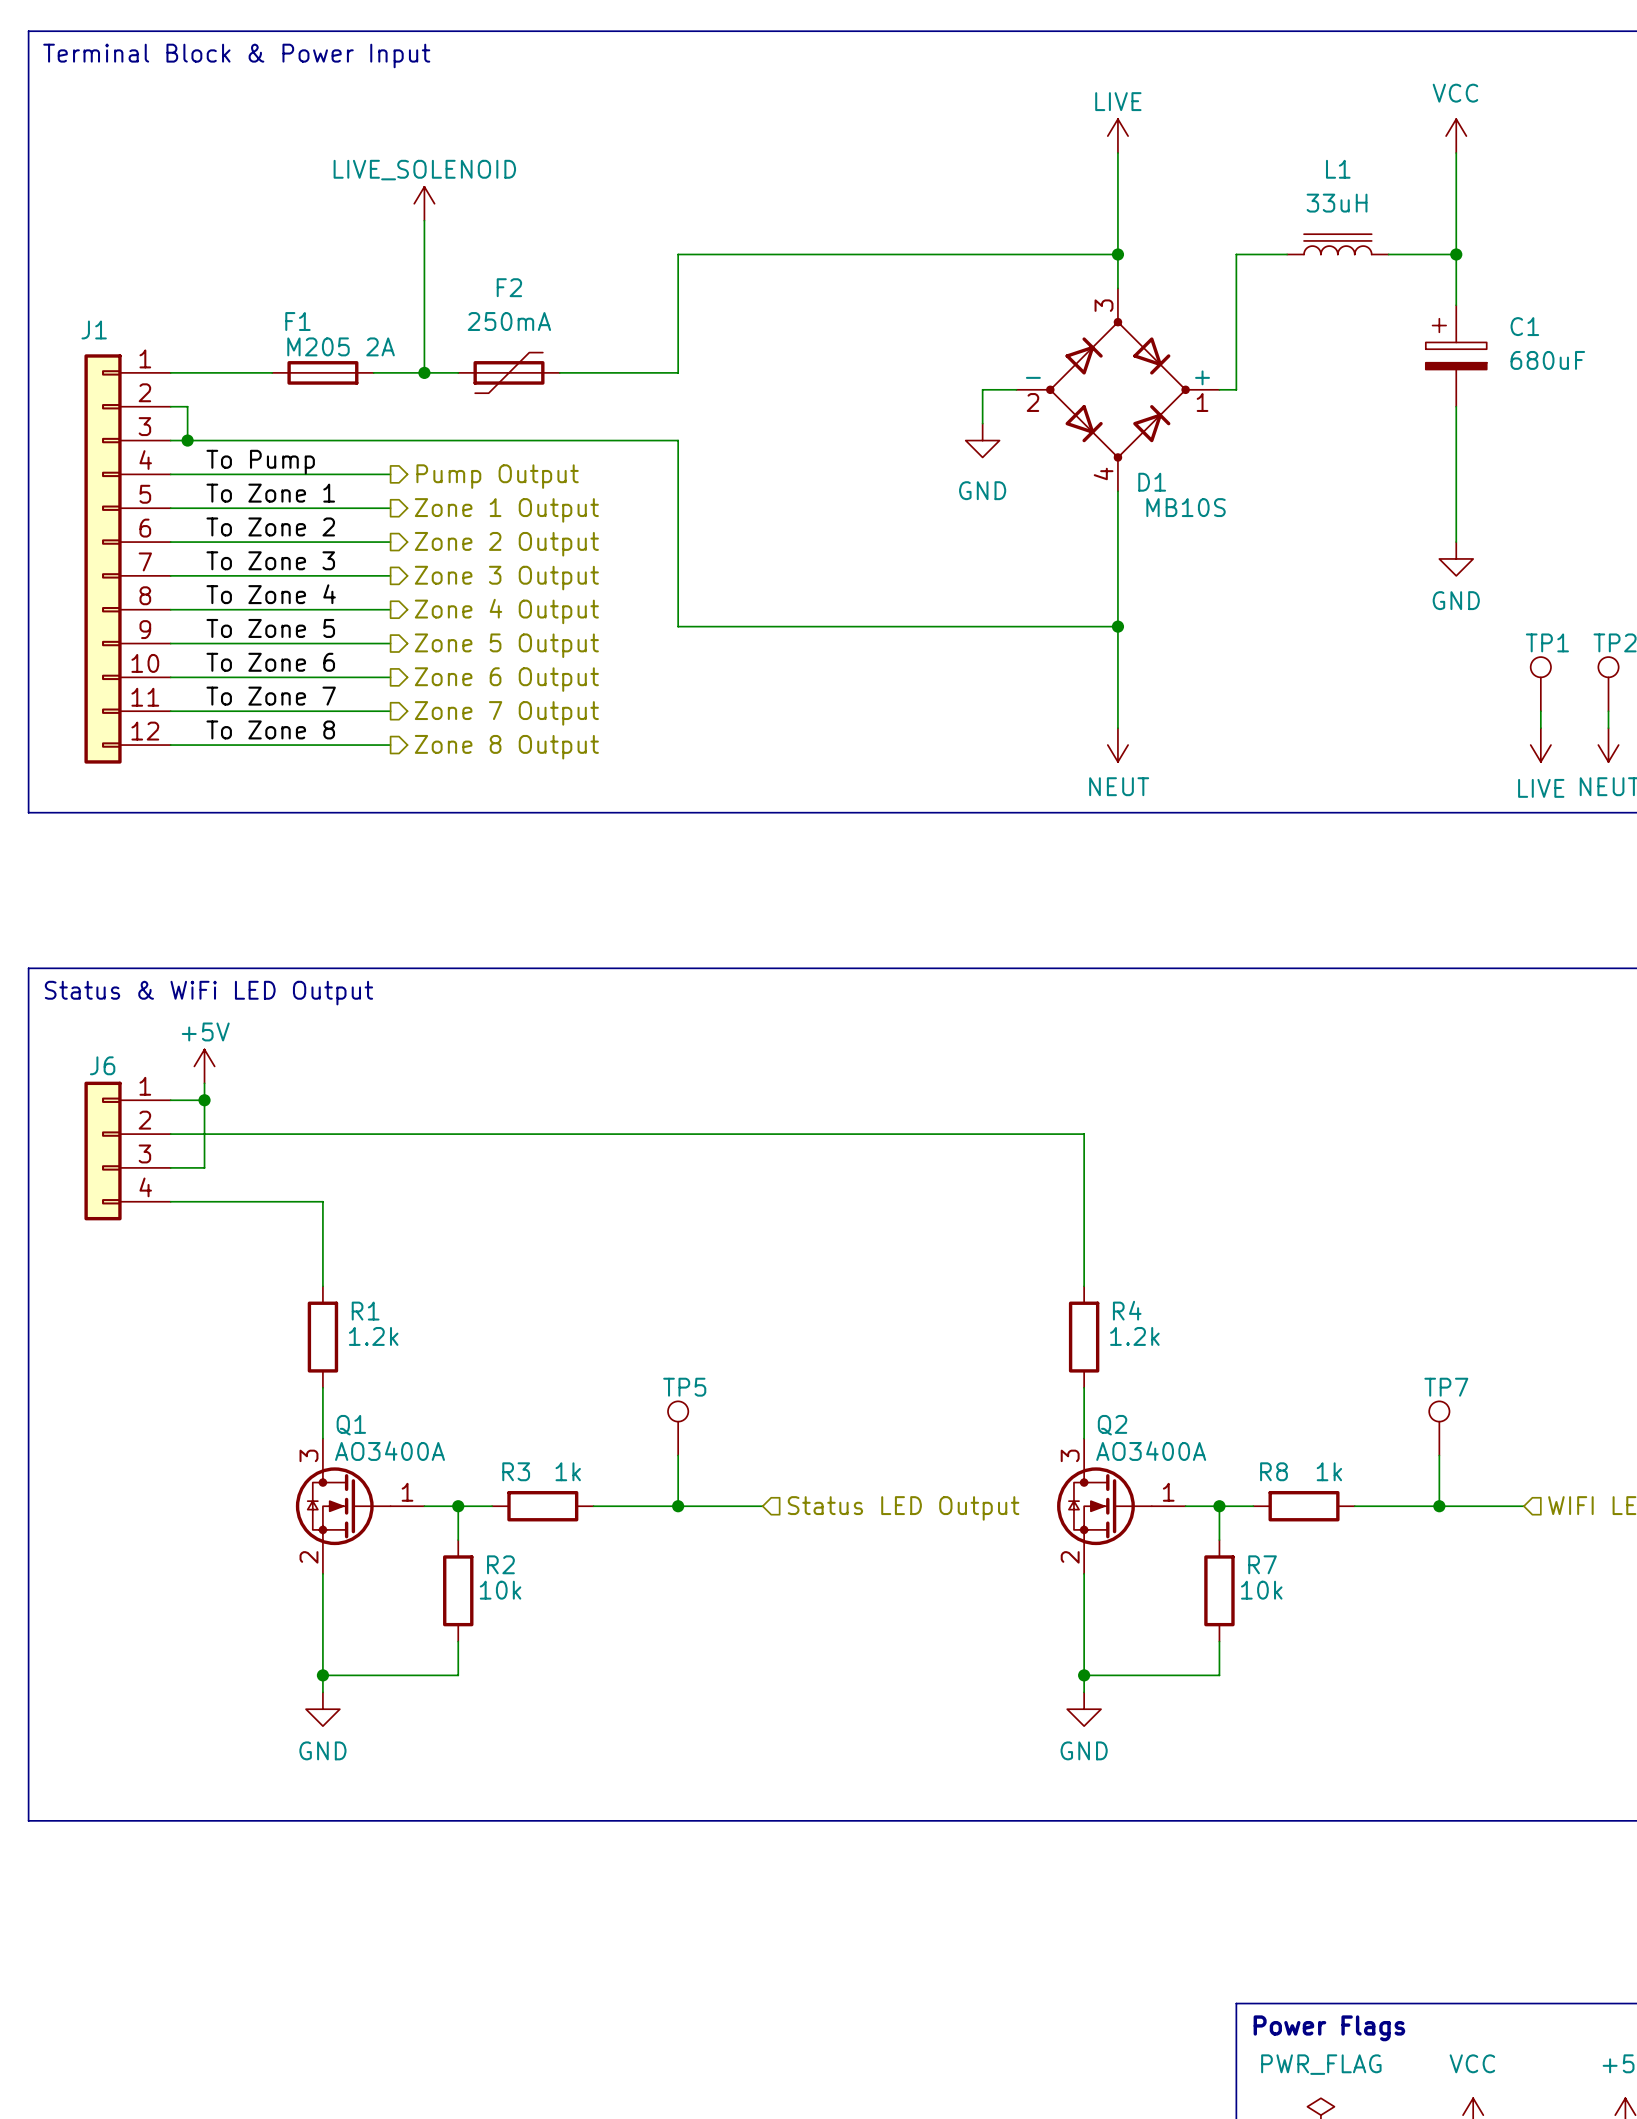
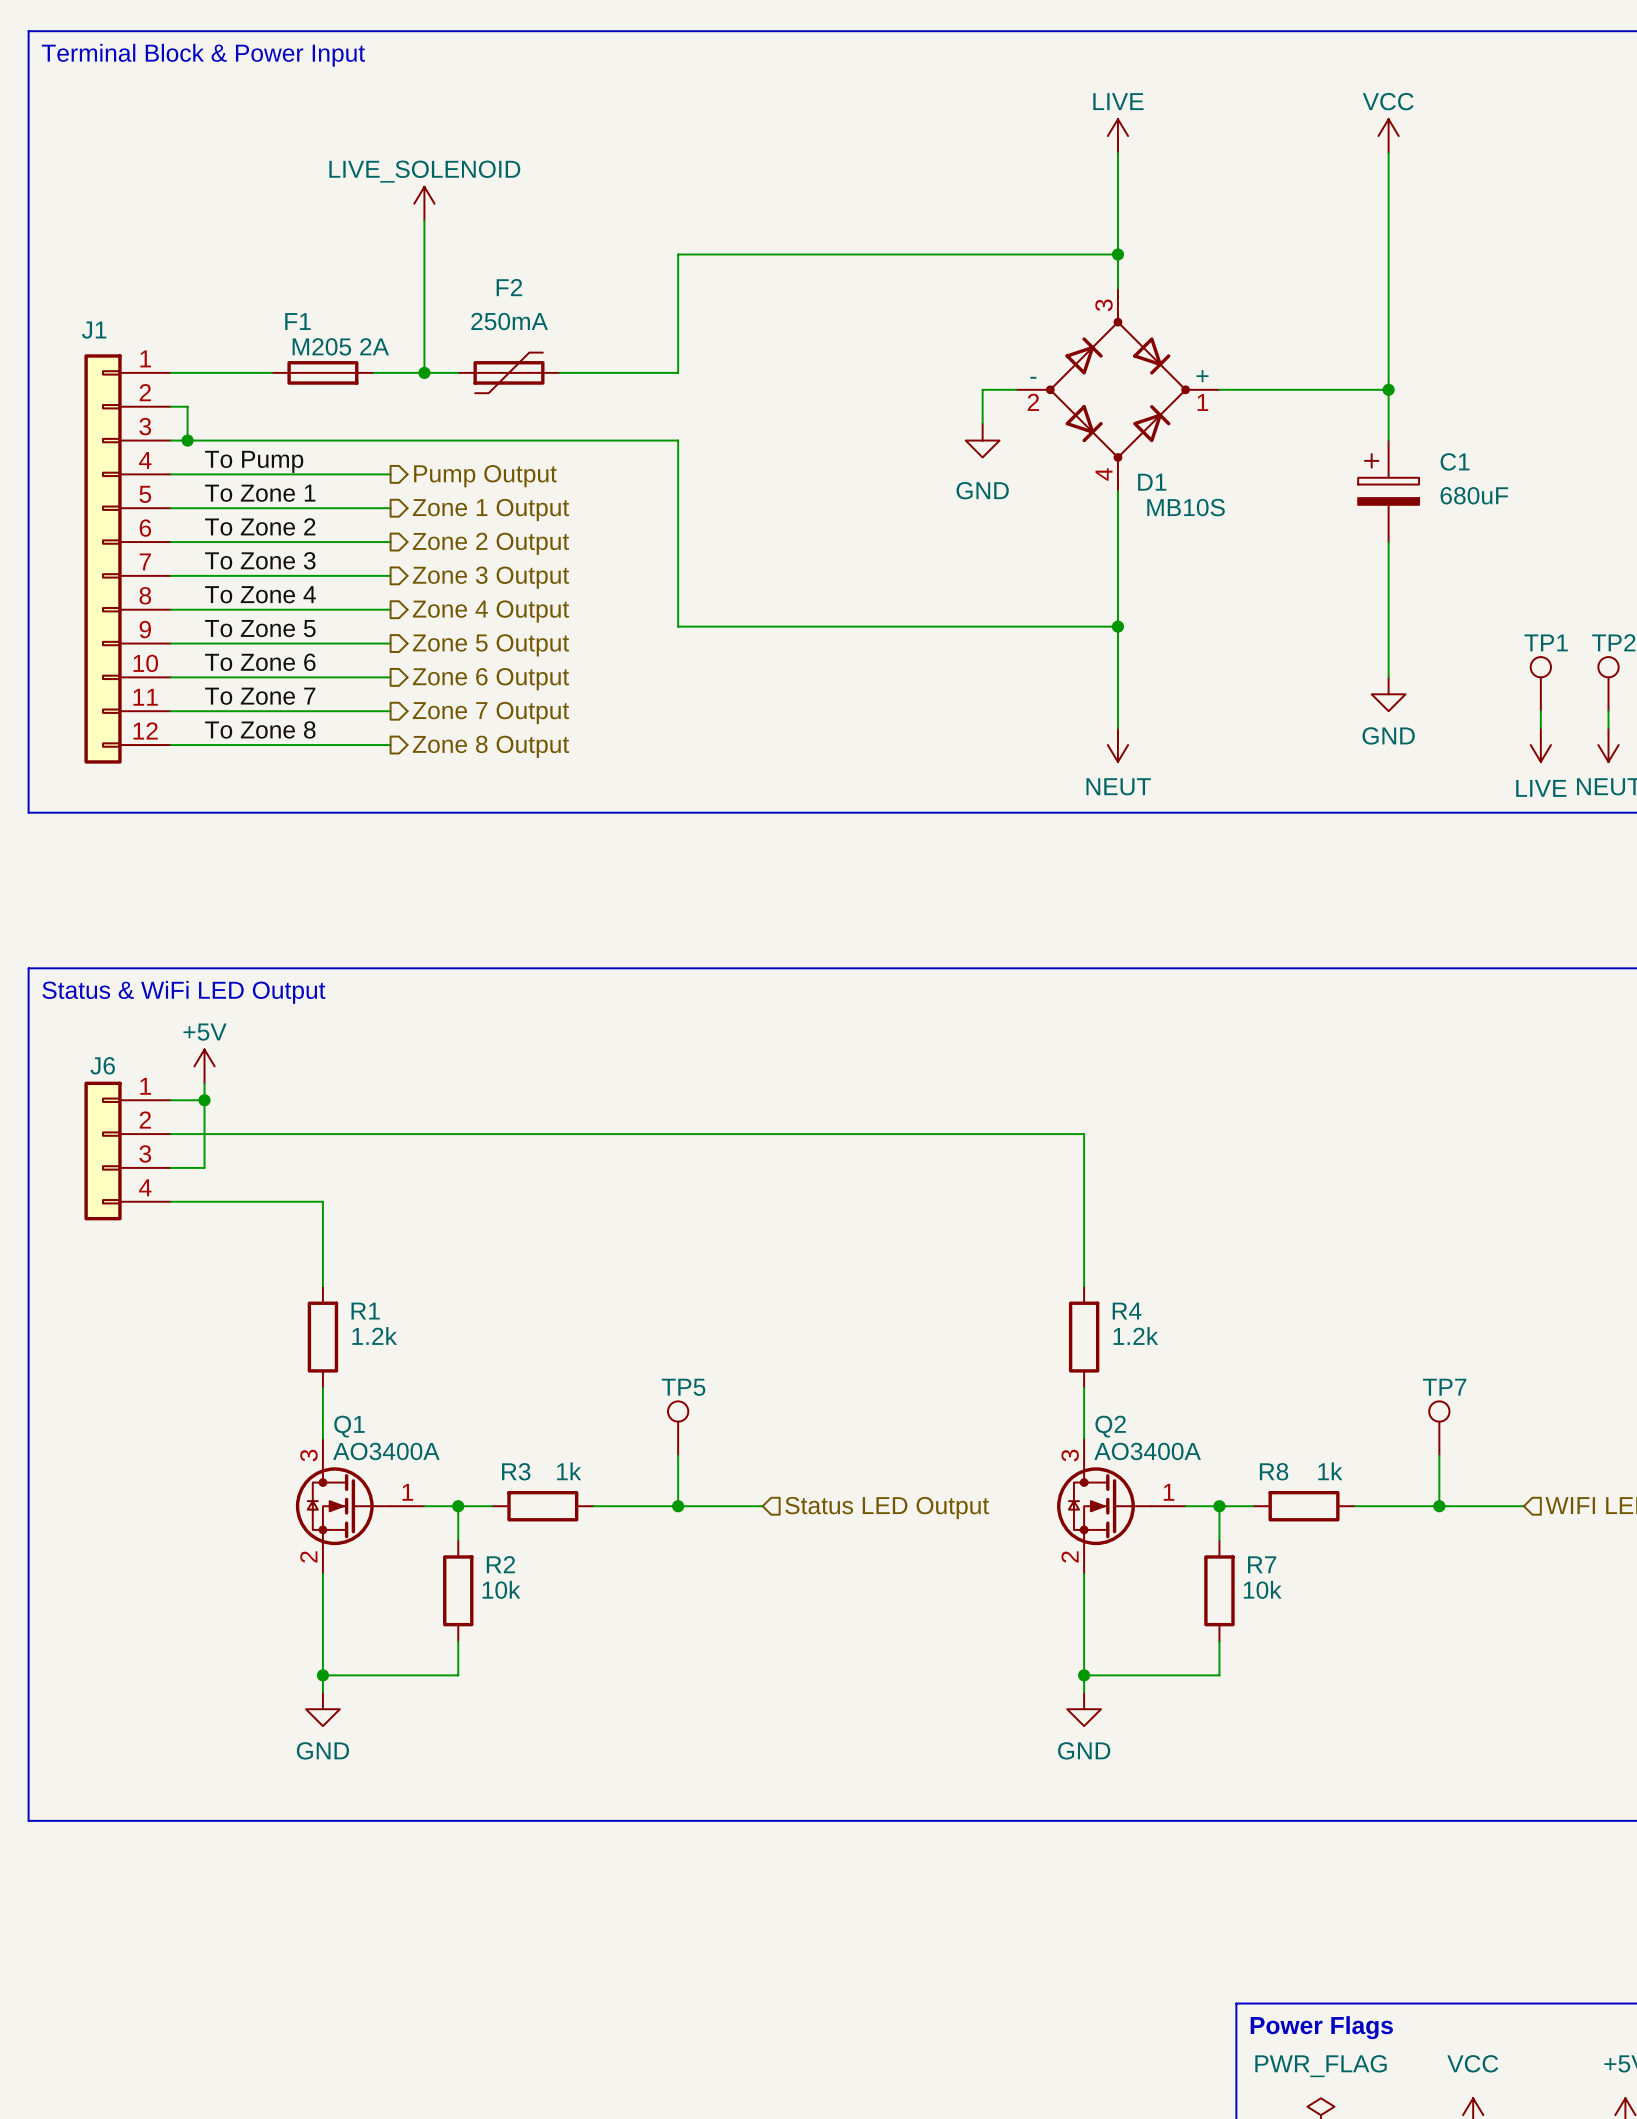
power symbol text position: VCC (1455, 93) -> VCC (1388, 101)
power symbol position: VCC (1456, 136) -> VCC (1388, 136)
wire: none -> (1388, 152) (1388, 440)
wire: (1456, 152) (1456, 305) -> none
L1: 33uH (1337, 244) -> none
wire: (1287, 254) (1236, 254) (1236, 389) -> (1388, 389) (1236, 389)
wire: (1388, 254) (1456, 254) -> none
junction: (1456, 254) -> none
C1 position: (1456, 355) -> (1388, 491)
junction: none -> (1388, 389)
wire: (1456, 406) (1456, 542) -> (1388, 542) (1388, 677)
power symbol position: GND (1456, 558) -> GND (1388, 694)

